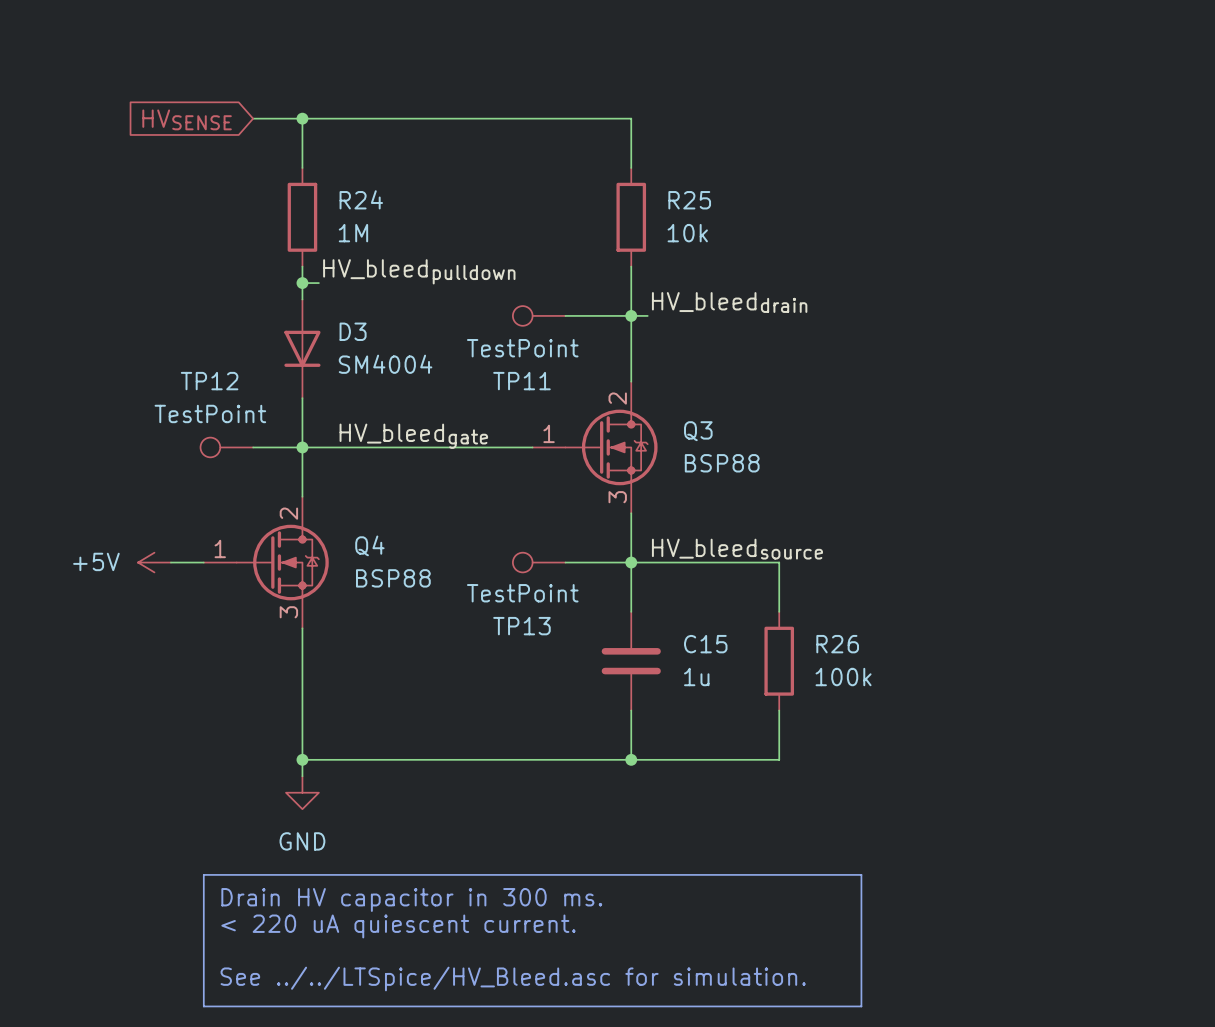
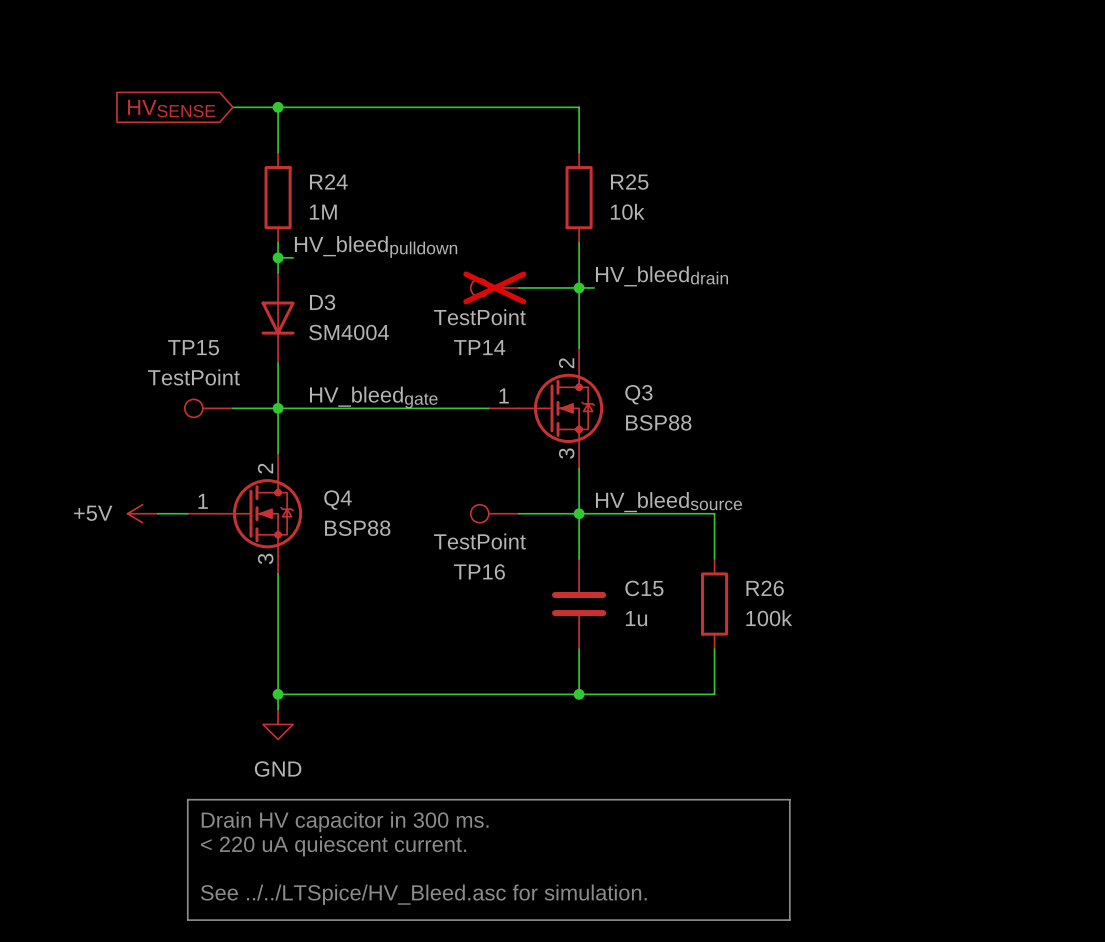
TP11 do-not-place cross: none -> (494, 287)
TP12 name: TP12 (209, 381) -> TP15 (193, 347)
TP11 name: TP11 (521, 381) -> TP14 (479, 347)
TP13 name: TP13 (521, 626) -> TP16 (479, 571)

